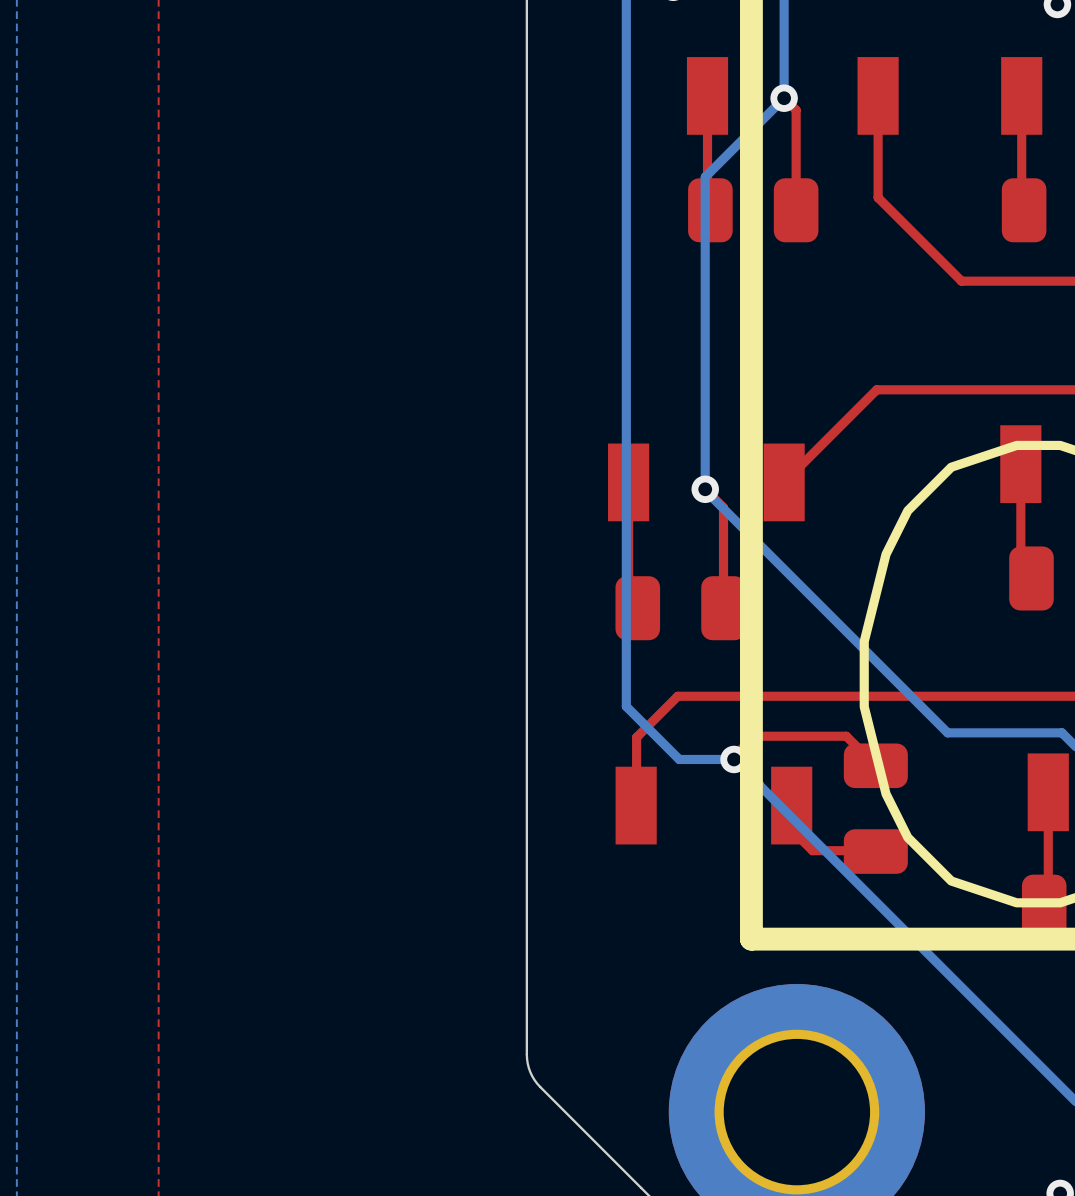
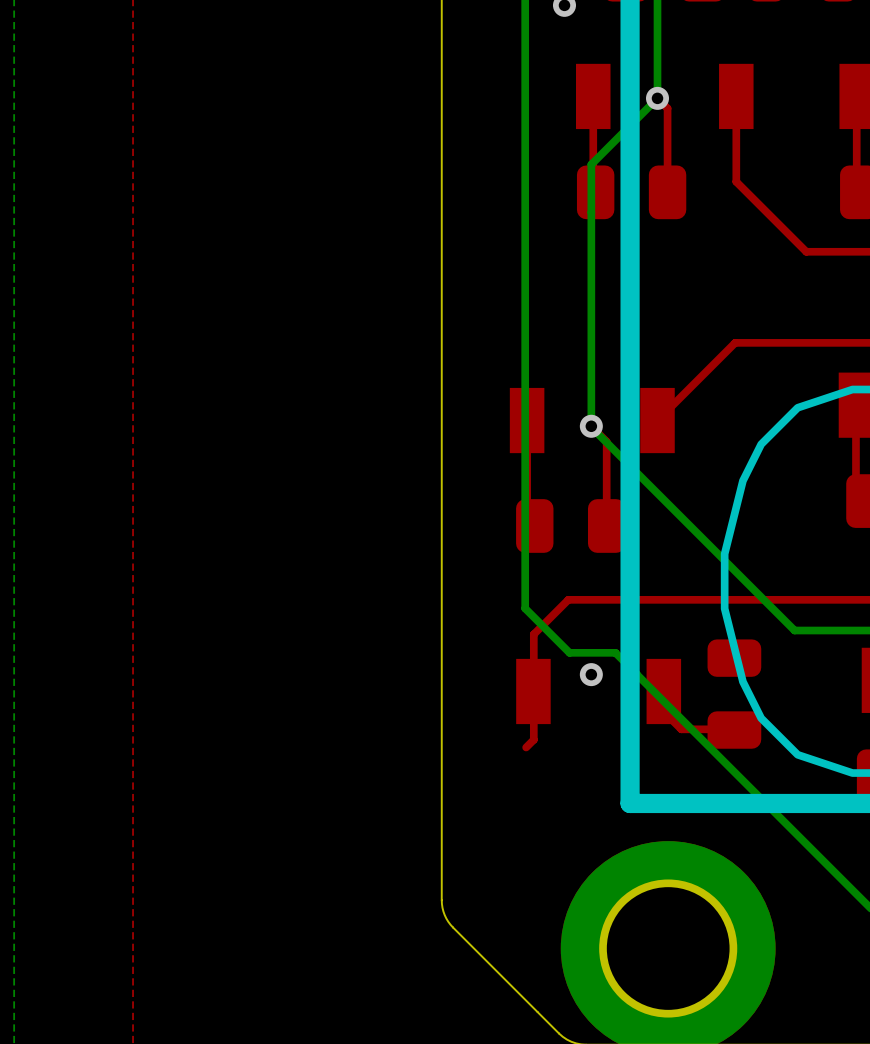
top track: (734, 759) (734, 756) (754, 736) (846, 736) (875, 765) -> none
via position: (734, 759) -> (591, 674)
top track: none -> (533, 691) (533, 739) (526, 747)

